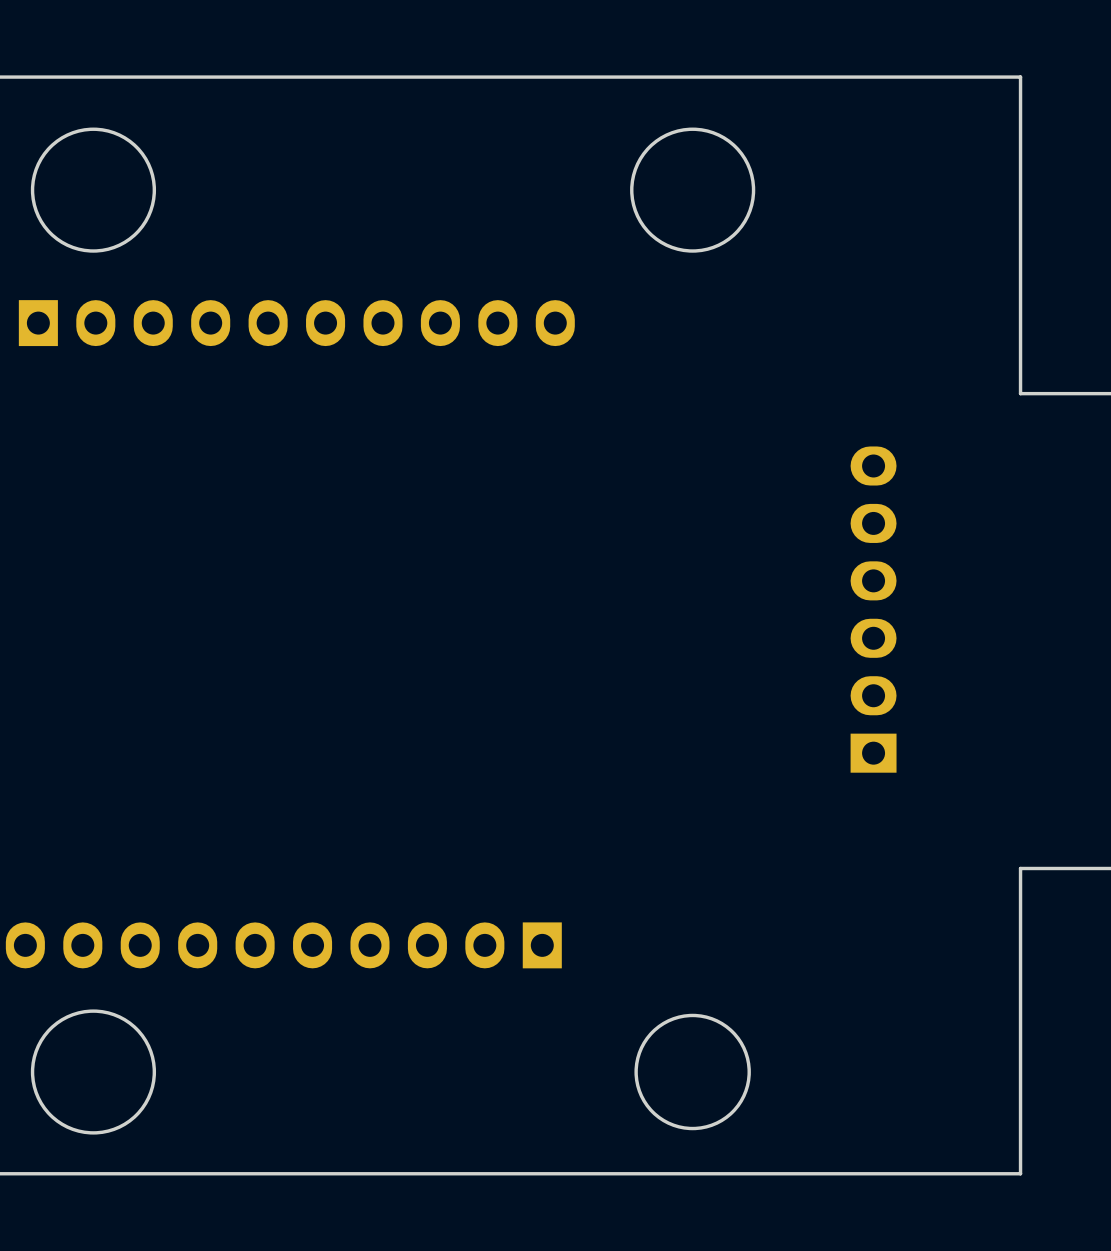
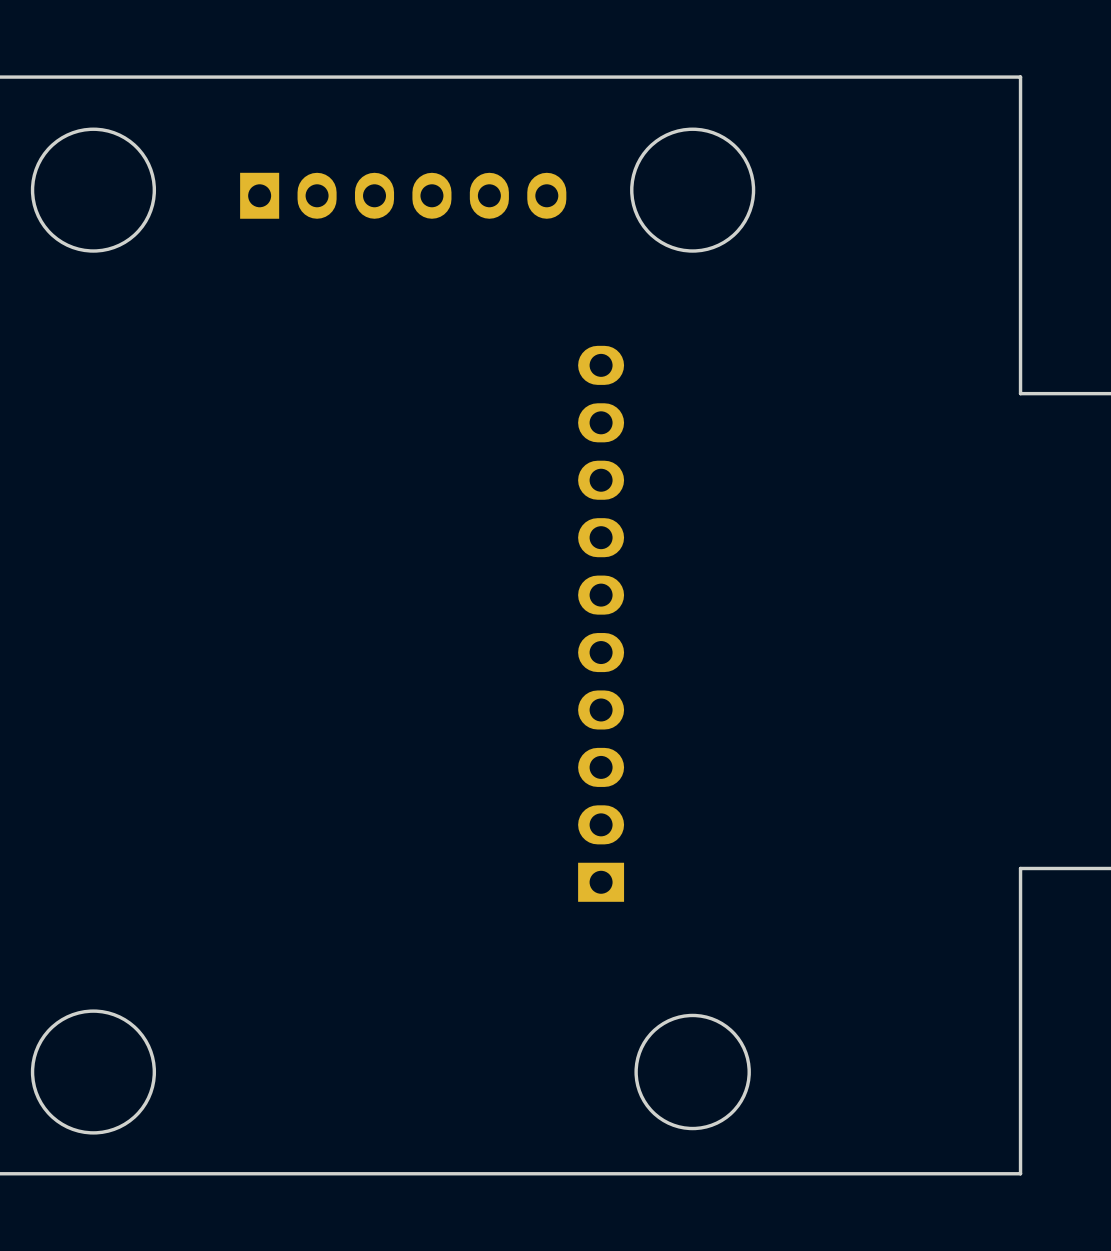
part: none -> (403, 195)
part: (296, 323) -> none
part: (873, 609) -> none
part: none -> (601, 623)
part: (283, 945) -> none

